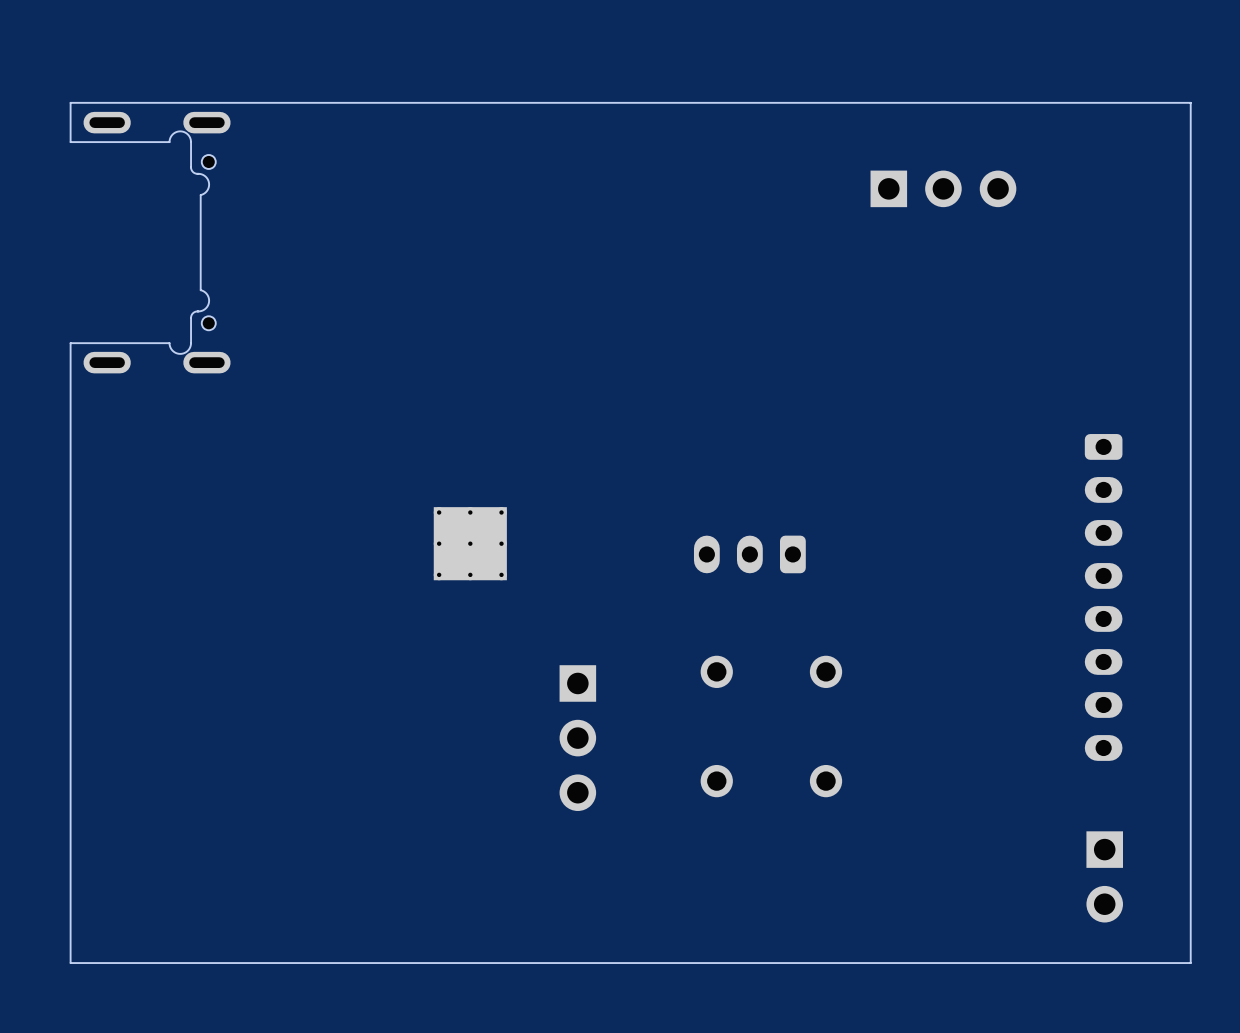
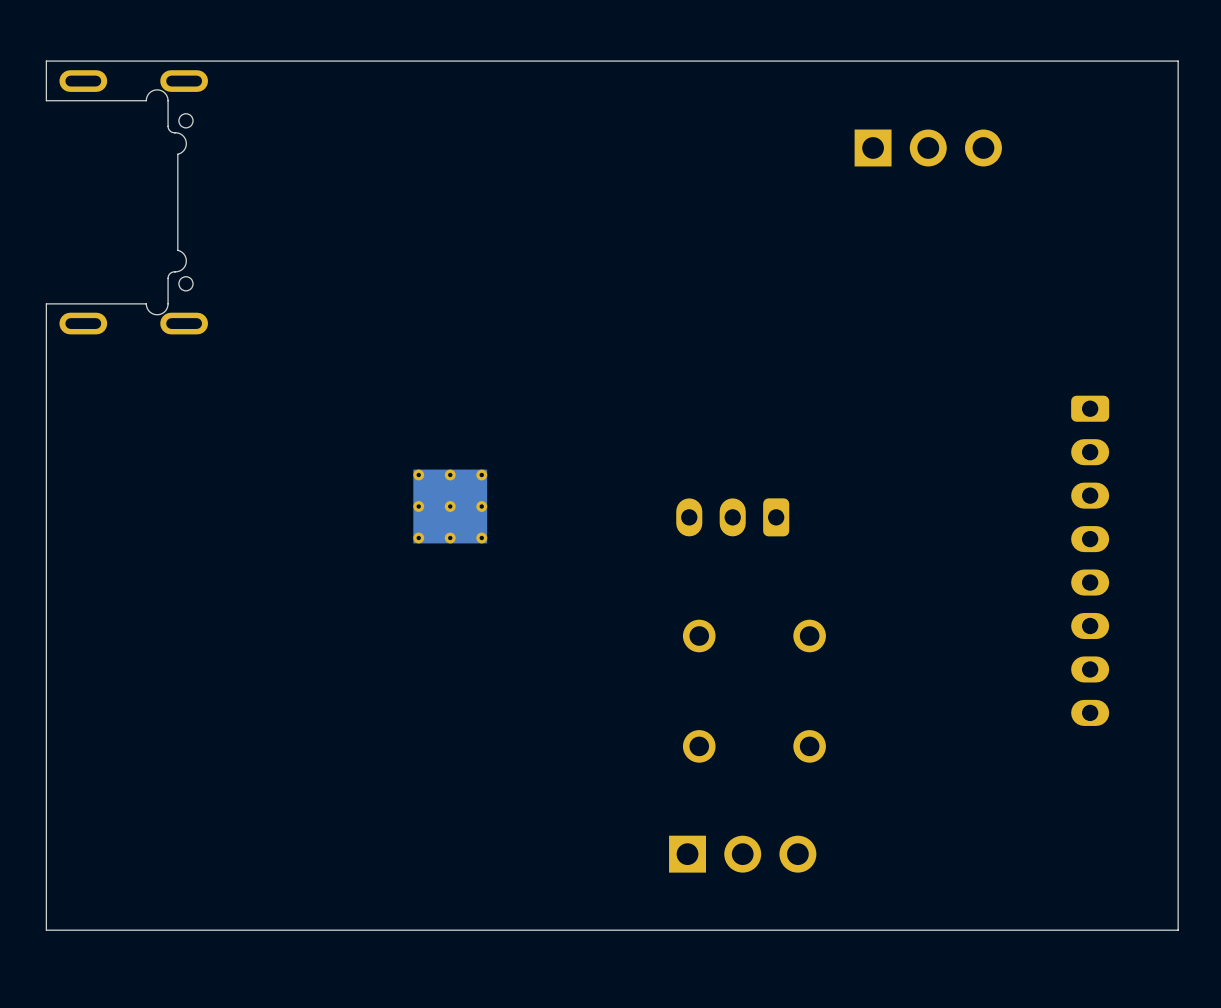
part rotation: 0° (577, 738) -> 90° counterclockwise (742, 854)
part position: (577, 738) -> (742, 854)
part: (1104, 876) -> none

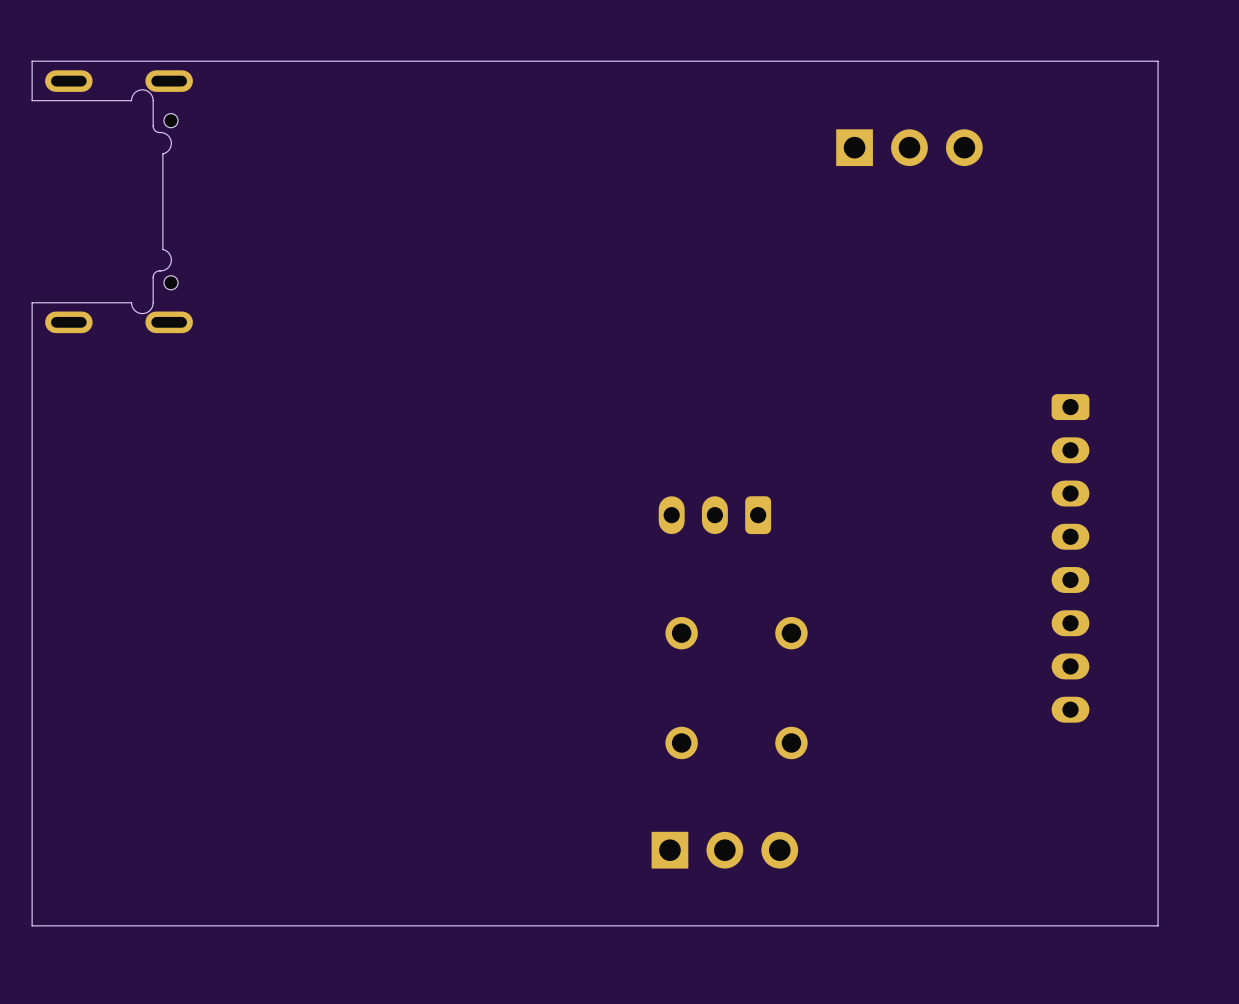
part: (450, 506) -> none

